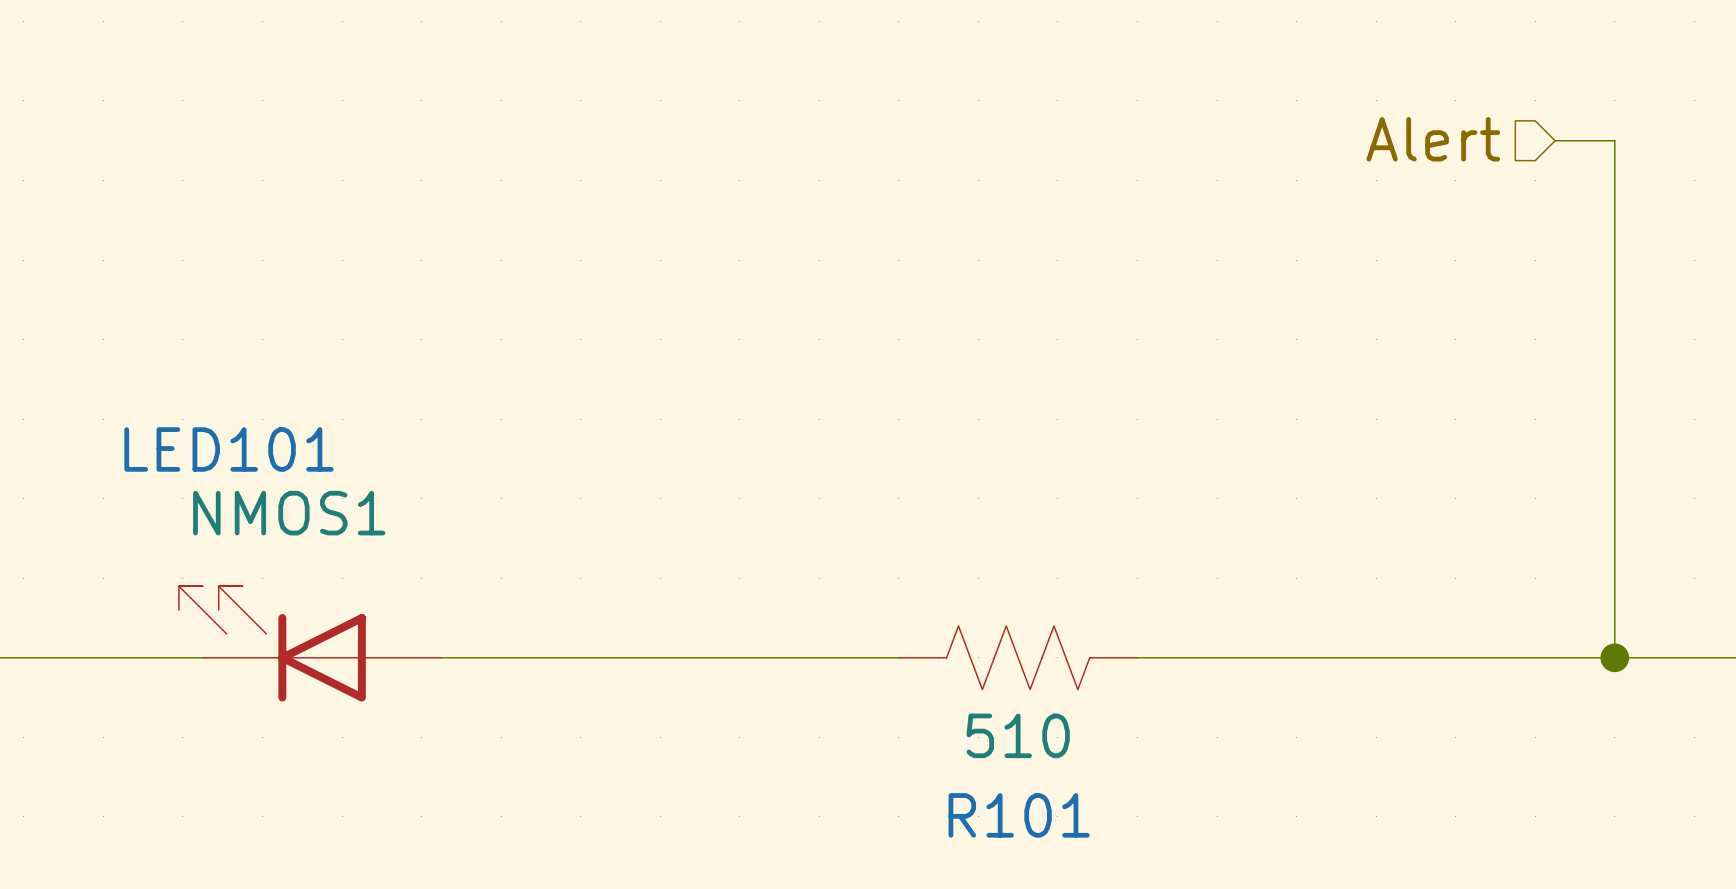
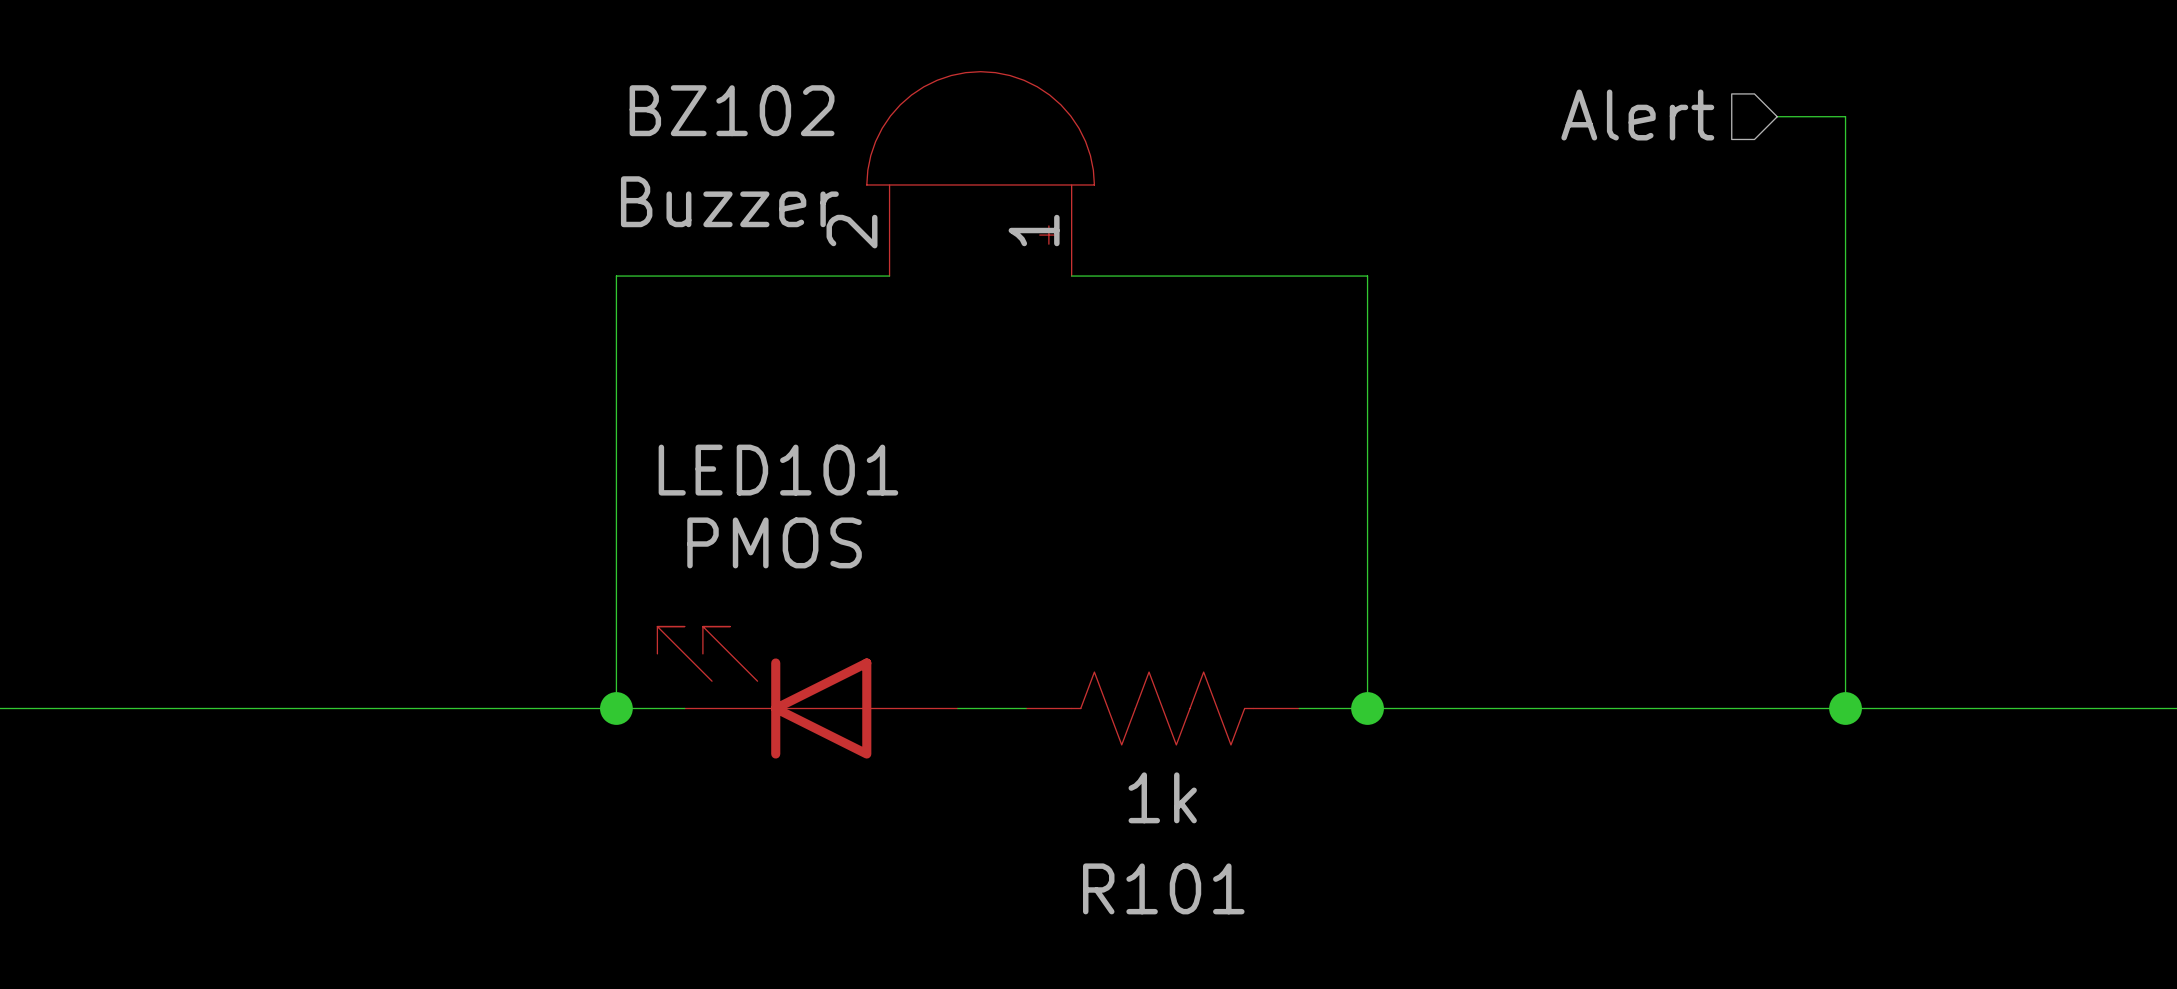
BZ102: none -> Buzzer (980, 173)
wire: none -> (889, 276) (616, 276) (616, 708)
wire: none -> (1071, 276) (1367, 276) (1367, 708)
LED101 name position: LED101 (229, 449) -> LED101 (778, 470)
LED101 value: NMOS1 (289, 513) -> PMOS (774, 542)
LED101 position: (310, 643) -> (807, 692)
junction: none -> (616, 708)
junction: none -> (1367, 708)
R101 value: 510 (1018, 735) -> 1k (1162, 797)

